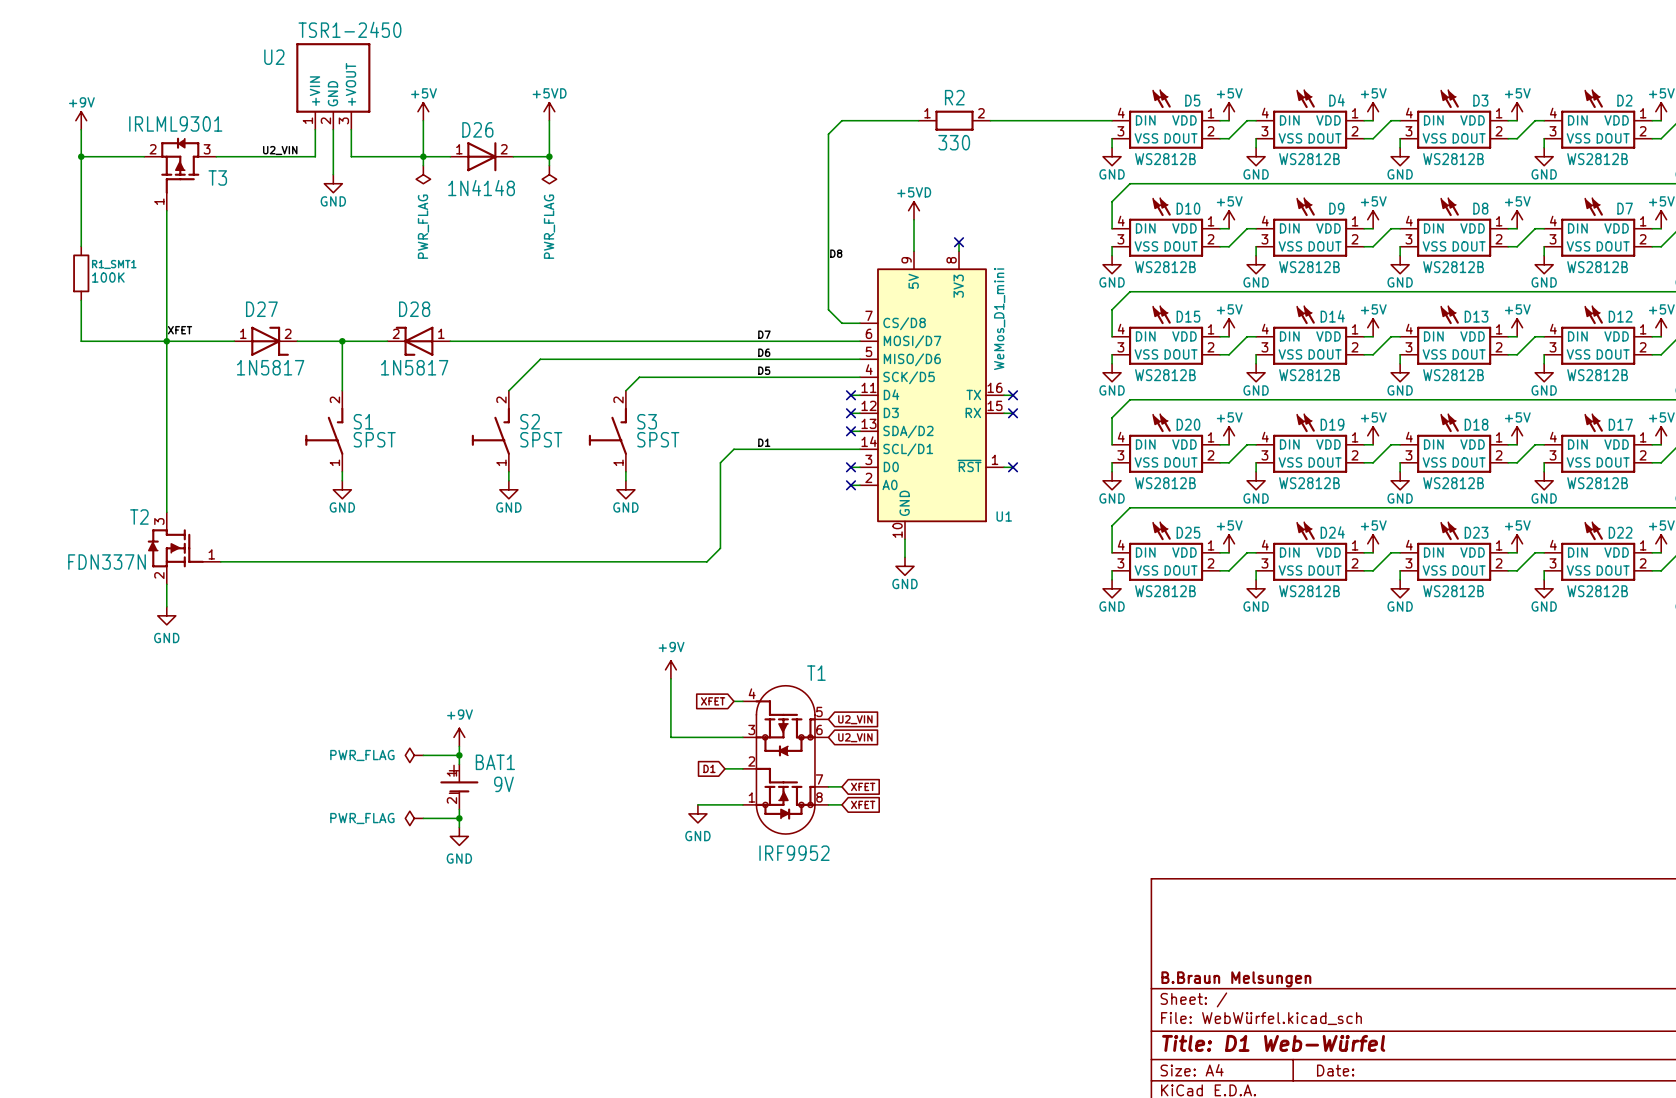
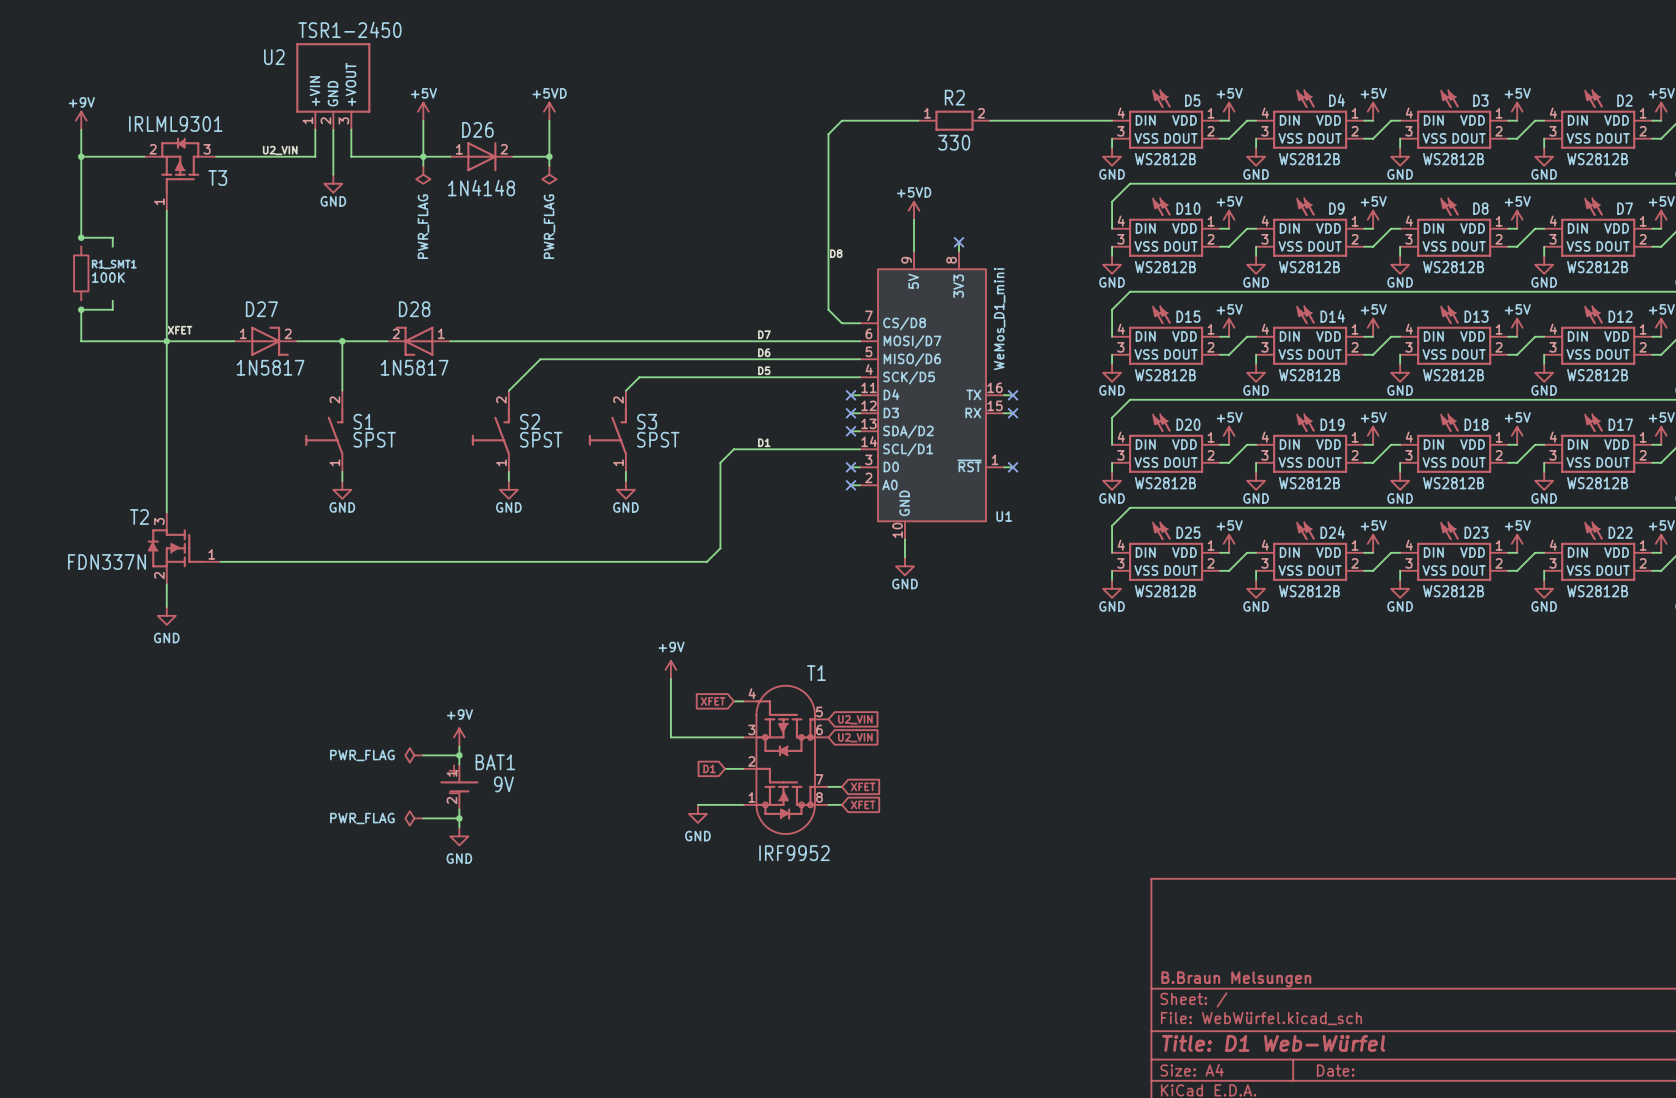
wire: (81, 237) (81, 246) -> (81, 237) (112, 237) (112, 246)
junction: none -> (81, 237)
wire: (81, 300) (81, 309) -> (112, 300) (112, 309) (81, 309)
junction: none -> (81, 309)

